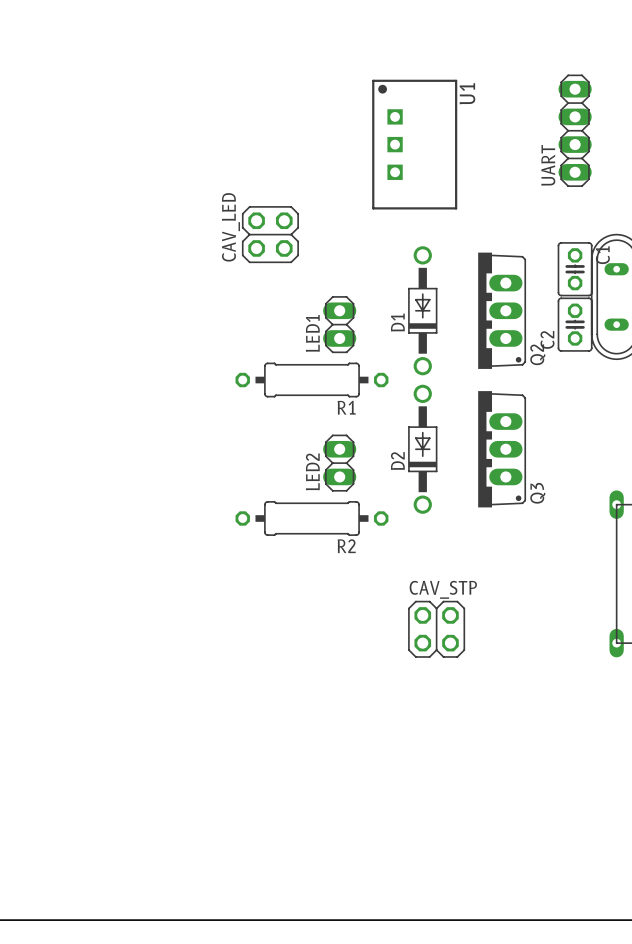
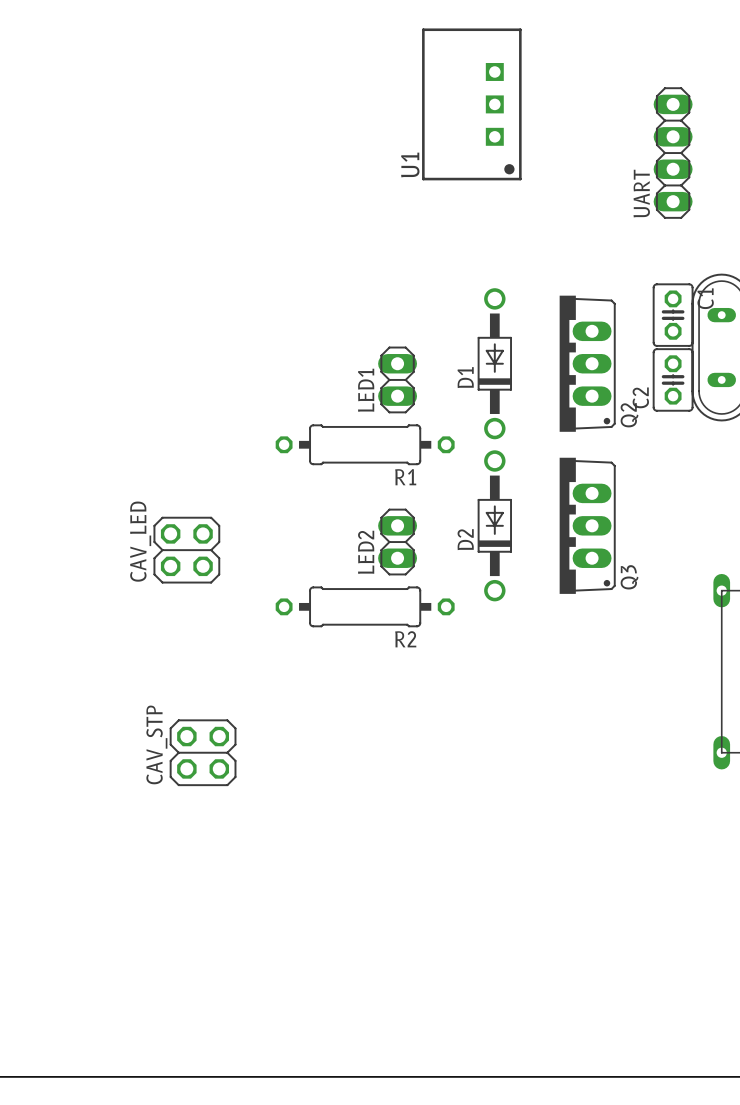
U1 rotation: 0° (414, 144) -> 180° (471, 104)
CAV_LED position: (270, 234) -> (186, 550)
CAV_STP name position: CAV_STP (443, 589) -> CAV_STP (156, 744)
CAV_STP rotation: 0° (436, 629) -> 90° clockwise (203, 752)
CAV_STP position: (436, 629) -> (203, 752)

